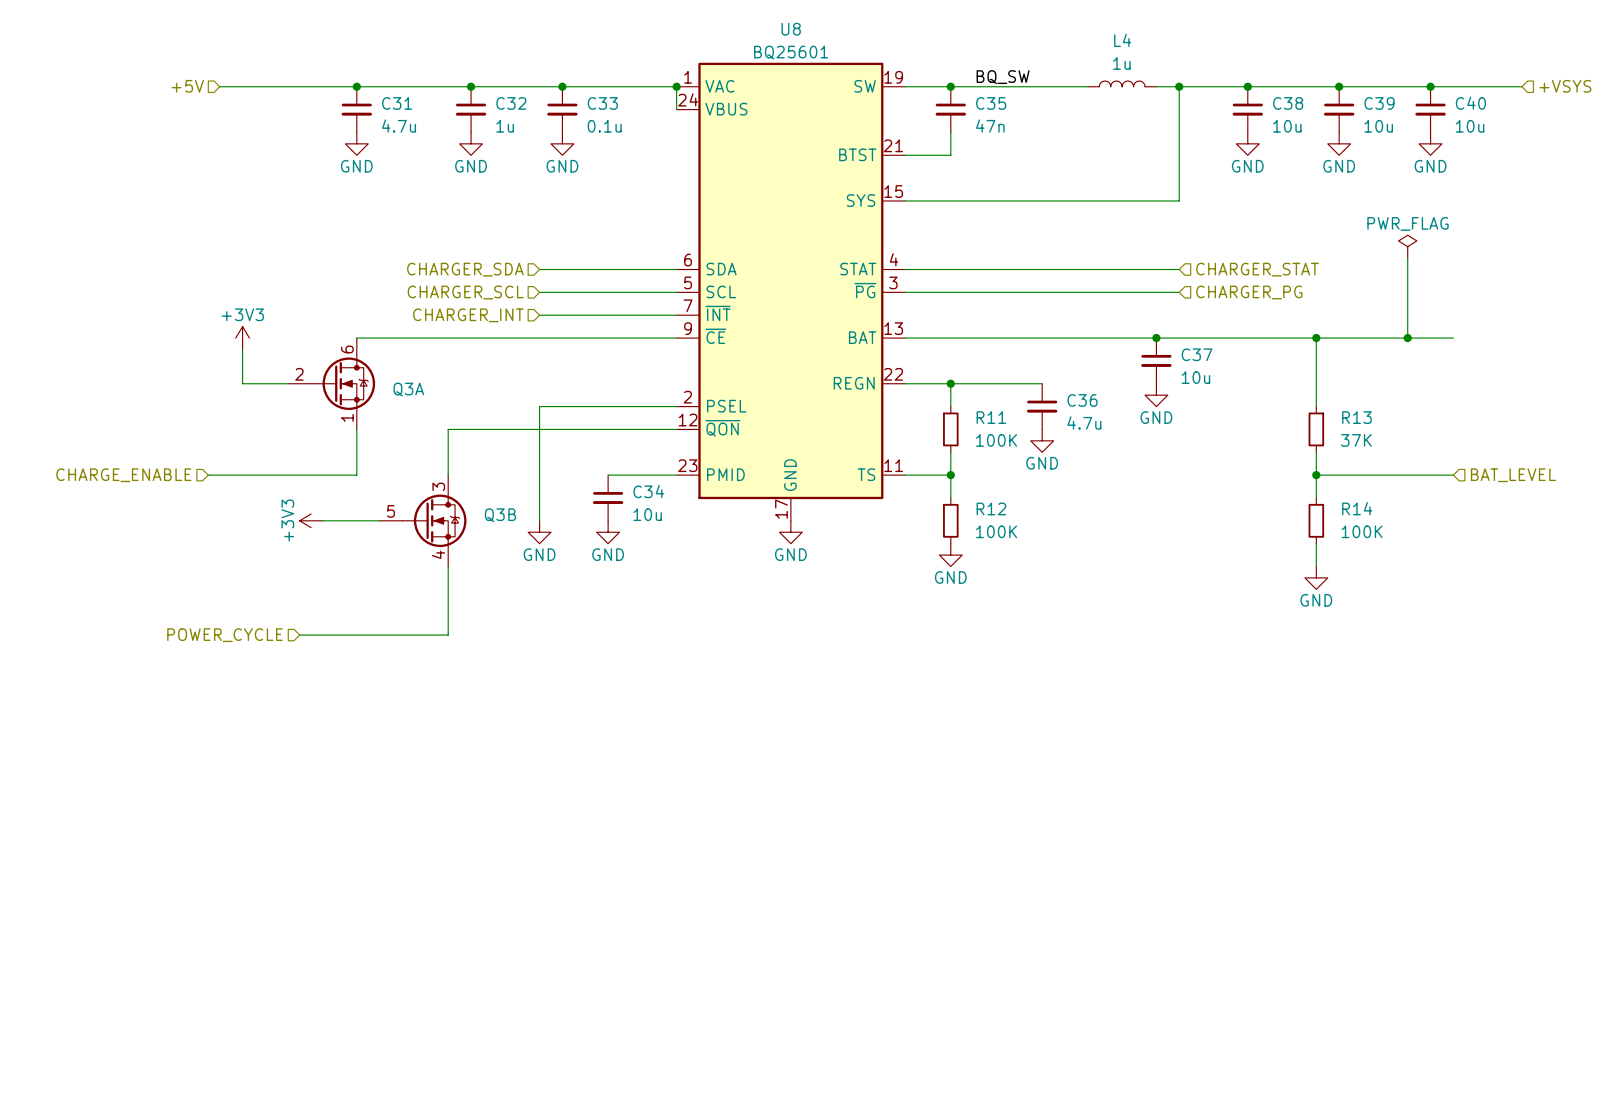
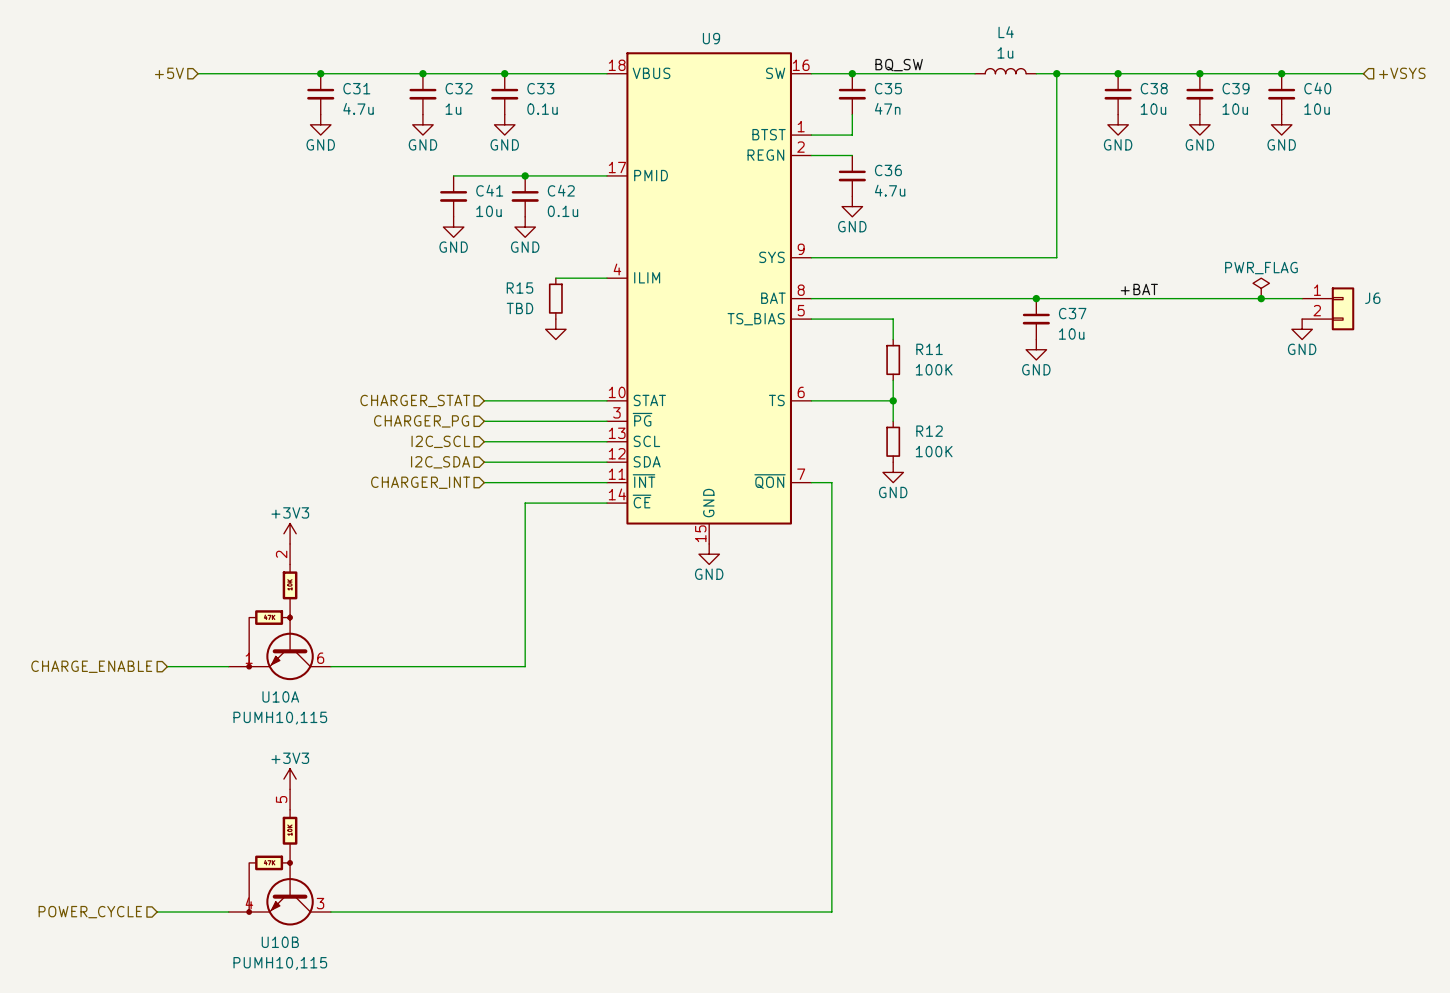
wire: (676, 86) (676, 109) -> none
junction: (676, 86) -> none
wire: none -> (811, 155) (852, 155)
wire: none -> (453, 175) (606, 175)
junction: none -> (525, 175)
wire: (905, 200) (1179, 200) -> (1056, 257) (1056, 175)
C41: none -> 10u (453, 196)
C42: none -> 0.1u (525, 196)
power symbol: none -> GND (852, 206)
power symbol position: PWR_FLAG (1407, 246) -> PWR_FLAG (1261, 288)
power symbol: none -> GND (453, 227)
power symbol: none -> GND (525, 227)
wire: (1407, 258) (1407, 338) -> none
hierarchical label: CHARGER_SDA (465, 269) -> none
wire: (539, 269) (676, 269) -> none
wire: (905, 269) (1179, 269) -> none
hierarchical label: CHARGER_STAT (1257, 269) -> none
U8: BQ25601 (790, 291) -> none
hierarchical label: CHARGER_SCL (465, 292) -> none
wire: (539, 292) (676, 292) -> (484, 400) (606, 400)
hierarchical label: CHARGER_PG (1249, 292) -> none
hierarchical label: CHARGER_INT (468, 315) -> none
wire: (539, 315) (619, 315) -> none
label: none -> +BAT (1139, 289)
U9: none -> (709, 298)
power symbol: +3V3 (242, 338) -> none
wire: (356, 338) (676, 338) -> none
R15: none -> TBD (555, 298)
wire: (1316, 338) (1316, 406) -> none
junction: (1316, 338) -> none
wire: (242, 349) (242, 383) (288, 383) -> none
J6: none -> (1328, 308)
wire: none -> (811, 319) (893, 319) (893, 339)
power symbol: none -> (555, 329)
power symbol: none -> GND (1302, 329)
Q3A: (331, 383) -> none
wire: (905, 383) (1042, 383) -> none
wire: (950, 383) (950, 406) -> none
junction: (950, 383) -> none
wire: (676, 406) (539, 406) (539, 520) -> (606, 462) (484, 462)
C36 position: (1042, 406) -> (852, 175)
wire: (356, 429) (356, 475) (208, 475) -> none
wire: (676, 429) (448, 429) (448, 475) -> none
R11 position: (950, 429) -> (893, 359)
R13: 37K (1316, 429) -> none
power symbol: GND (1042, 440) -> none
hierarchical label: none -> CHARGER_STAT (415, 400)
wire: none -> (811, 400) (893, 400)
wire: (950, 452) (950, 497) -> (893, 380) (893, 421)
junction: none -> (893, 400)
wire: (1316, 452) (1316, 497) -> none
hierarchical label: CHARGE_ENABLE (123, 475) -> none
hierarchical label: none -> CHARGER_PG (421, 421)
wire: none -> (484, 421) (545, 421)
wire: (905, 475) (950, 475) -> none
junction: (950, 475) -> none
wire: (1316, 475) (1453, 475) -> none
junction: (1316, 475) -> none
hierarchical label: BAT_LEVEL (1513, 475) -> none
wire: none -> (484, 441) (606, 441)
C34: 10u (608, 497) -> none
hierarchical label: none -> I2C_SCL (440, 441)
power symbol rotation: 0° (311, 520) -> 90° clockwise (290, 533)
power symbol position: +3V3 (311, 520) -> +3V3 (290, 533)
wire: (322, 520) (379, 520) -> none
Q3B: (423, 520) -> none
hierarchical label: none -> I2C_SDA (440, 462)
R12 position: (950, 520) -> (893, 441)
R14: 100K (1316, 520) -> none
power symbol: GND (539, 532) -> none
power symbol: GND (608, 532) -> none
power symbol: GND (790, 532) -> none
power symbol: none -> GND (893, 472)
hierarchical label: none -> CHARGER_INT (420, 482)
wire: none -> (484, 482) (606, 482)
wire: none -> (811, 482) (831, 482) (831, 912) (330, 912)
wire: (1316, 543) (1316, 566) -> none
power symbol: GND (950, 555) -> none
wire: (448, 566) (448, 635) (299, 635) -> none
wire: none -> (606, 503) (525, 503) (525, 666) (330, 666)
power symbol: GND (1316, 577) -> none
power symbol: none -> GND (709, 554)
hierarchical label: POWER_CYCLE (225, 635) -> none
U10A: none -> PUMH10,115 (279, 612)
hierarchical label: none -> CHARGE_ENABLE (91, 666)
wire: none -> (167, 666) (228, 666)
power symbol: none -> +3V3 (290, 779)
U10B: none -> PUMH10,115 (279, 857)
hierarchical label: none -> POWER_CYCLE (90, 912)
wire: none -> (157, 912) (228, 912)

